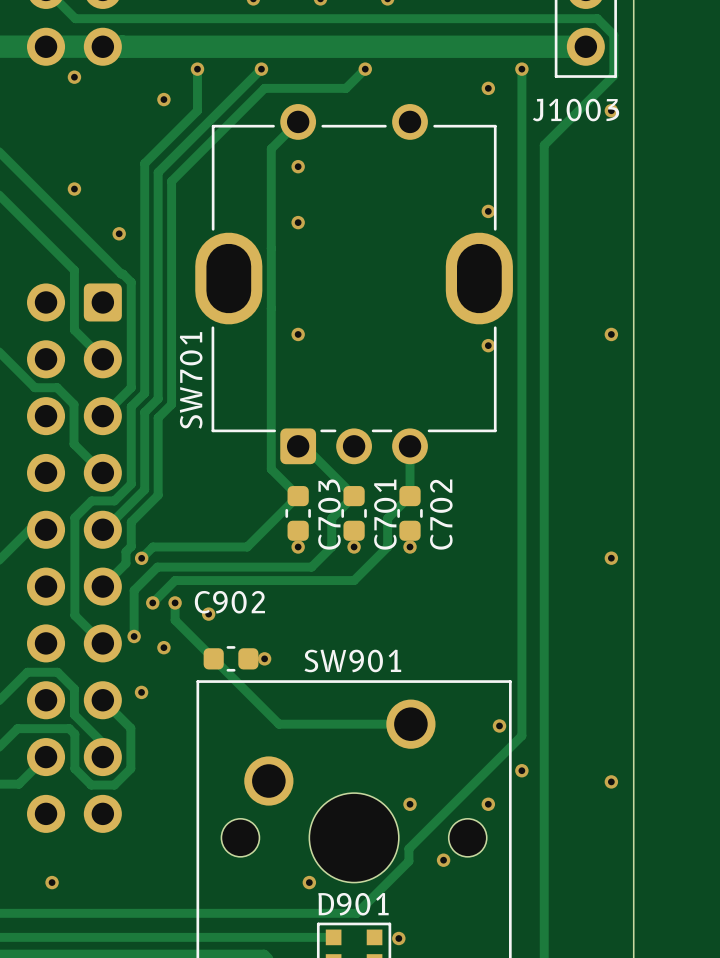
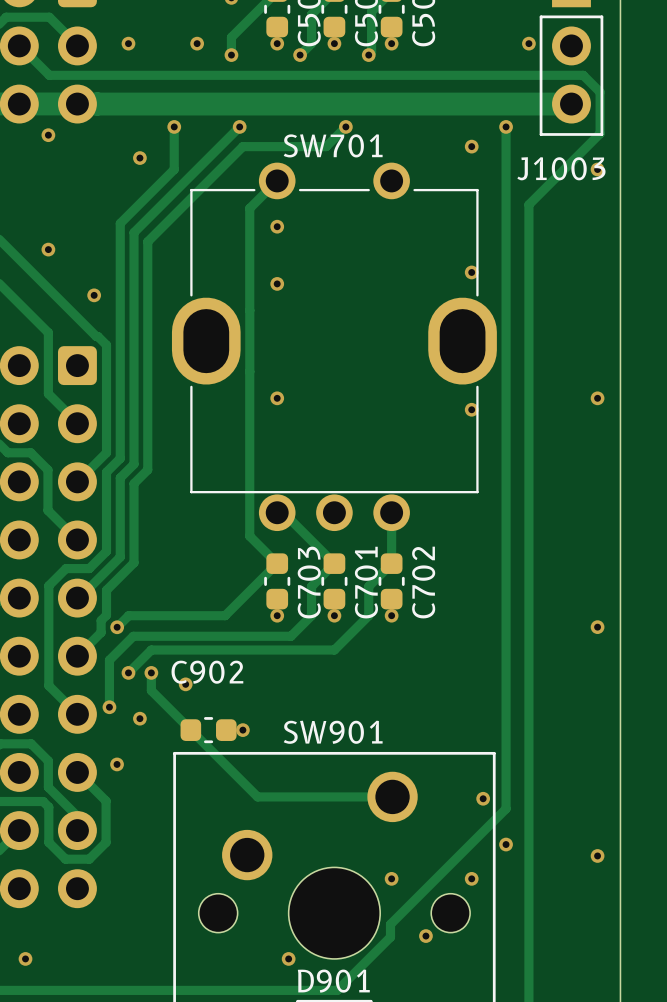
SW701 footprint: [195, 104, 513, 465] -> [171, 162, 497, 532]
SW701 name position: SW701 (191, 380) -> SW701 (333, 145)

